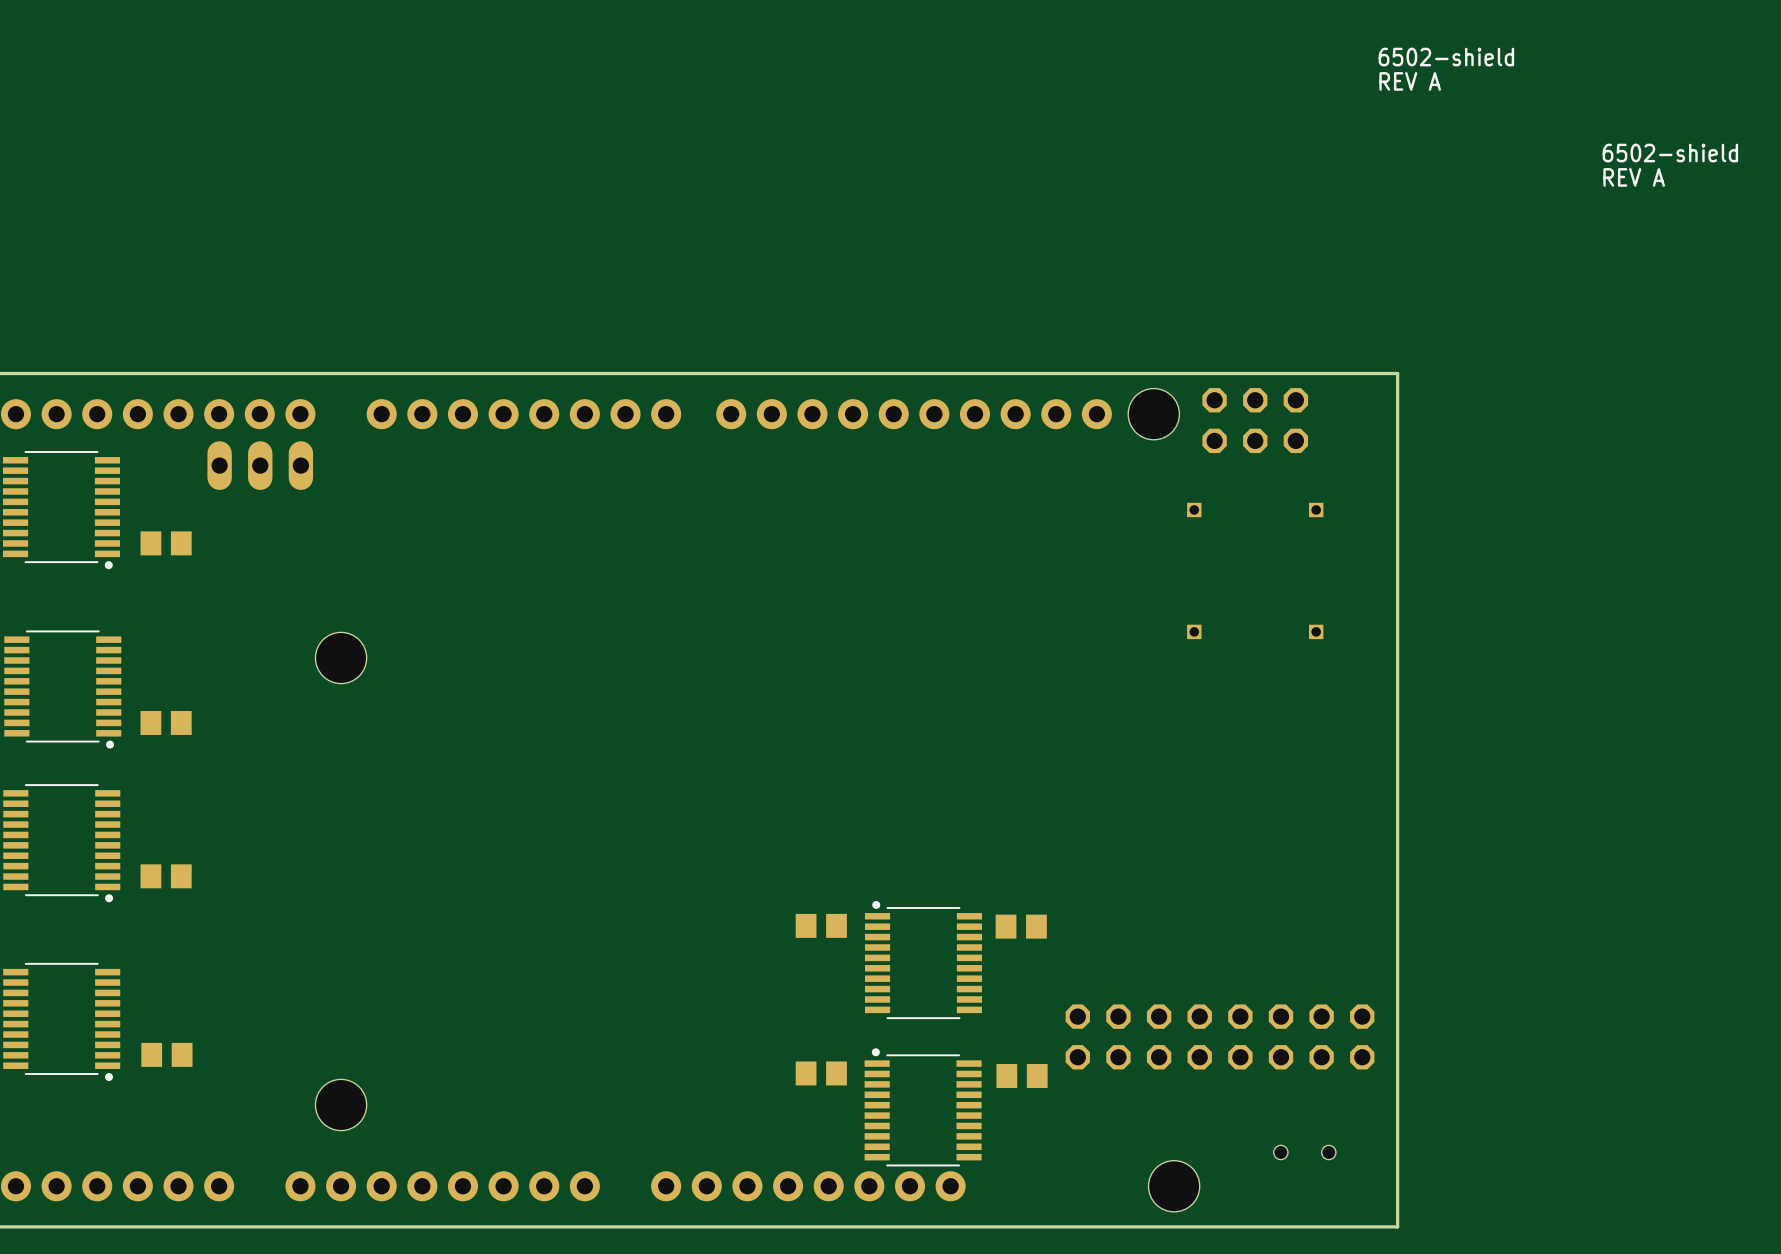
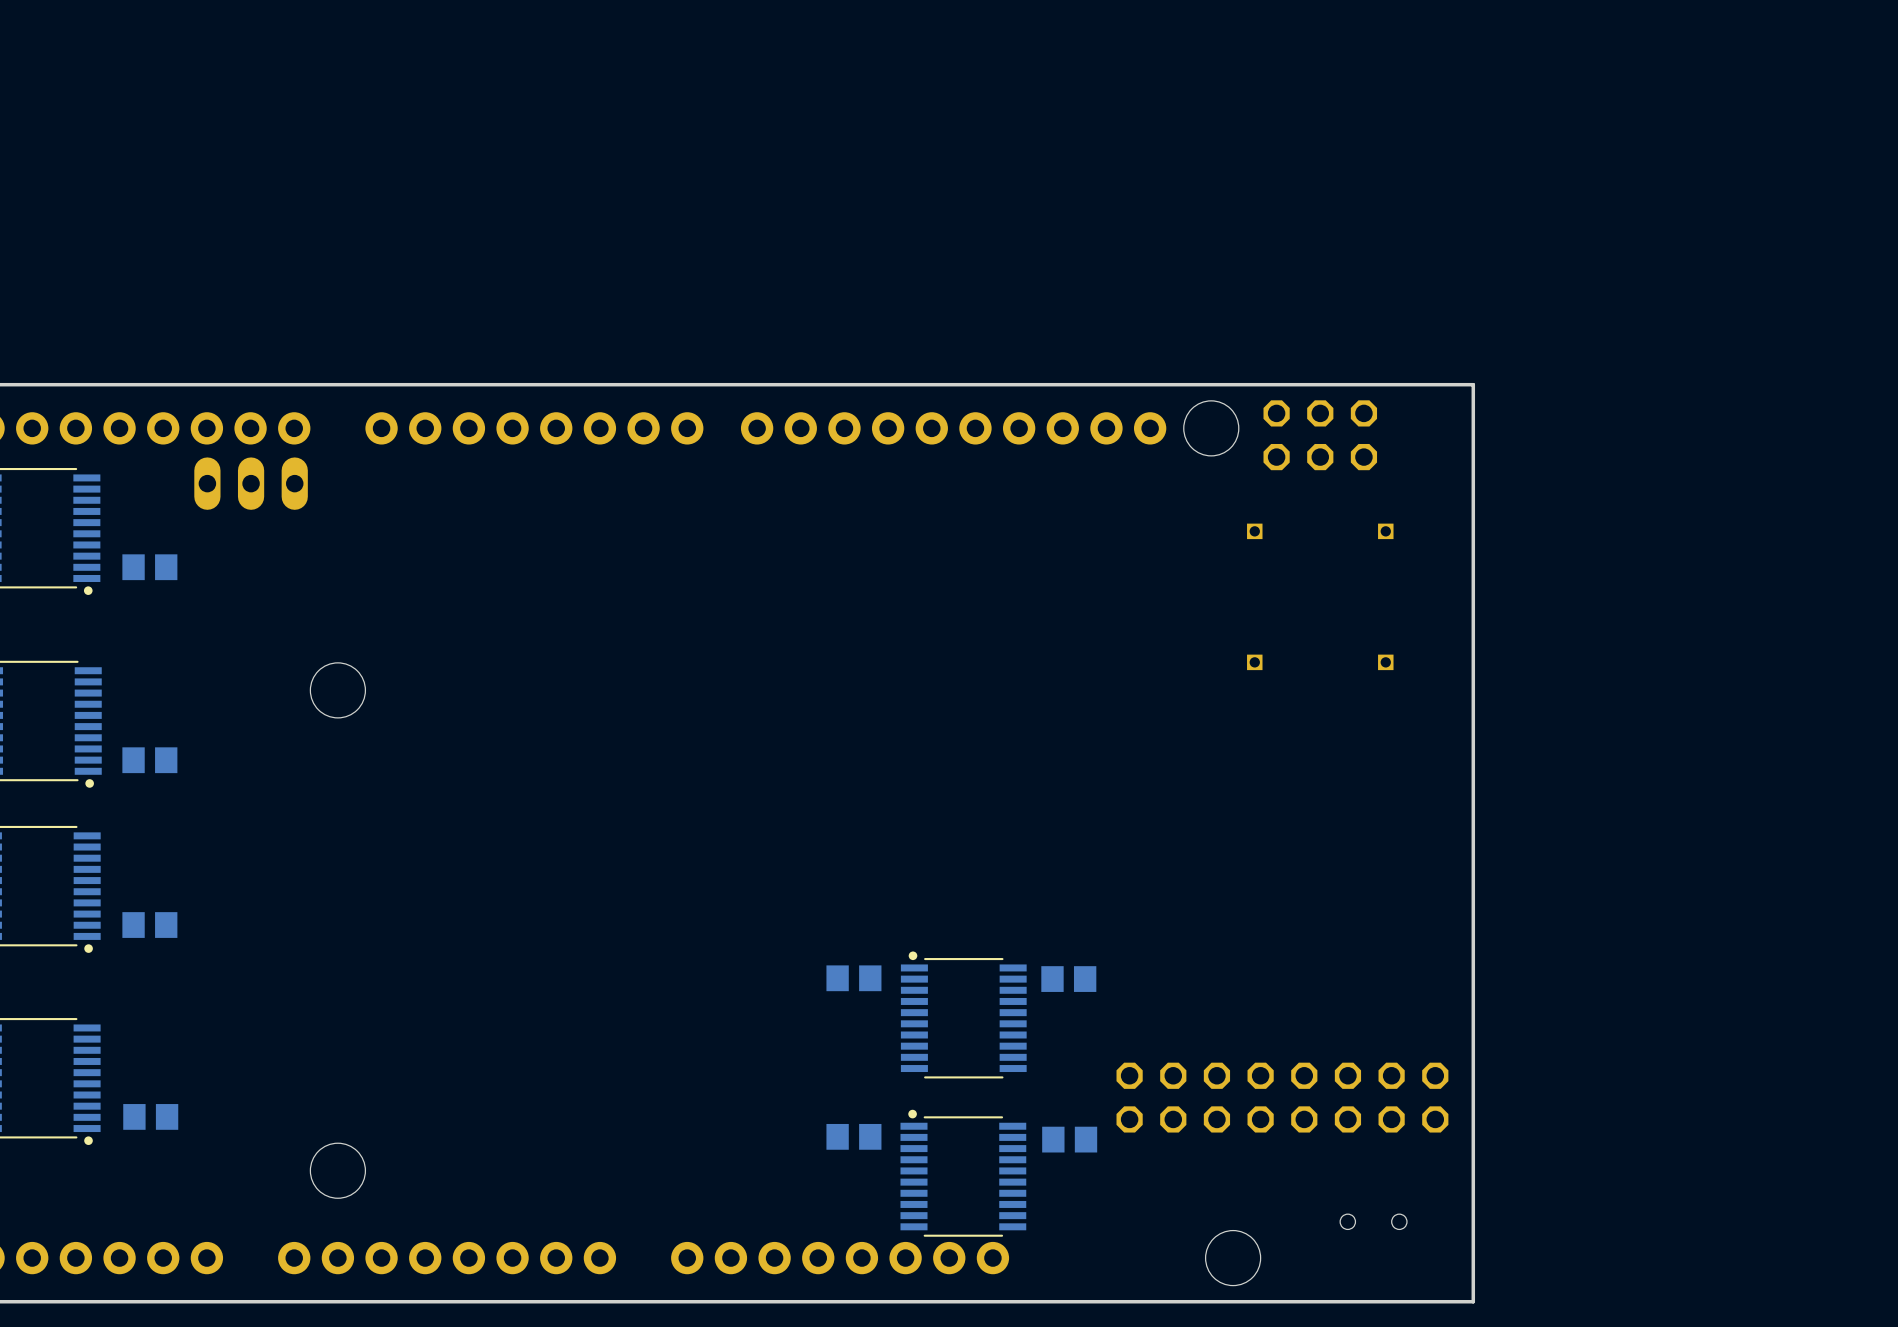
text: 6502-shield (1446, 57) -> none
text: REV A (1410, 81) -> none
text: 6502-shield (1670, 153) -> none
text: REV A (1634, 177) -> none

